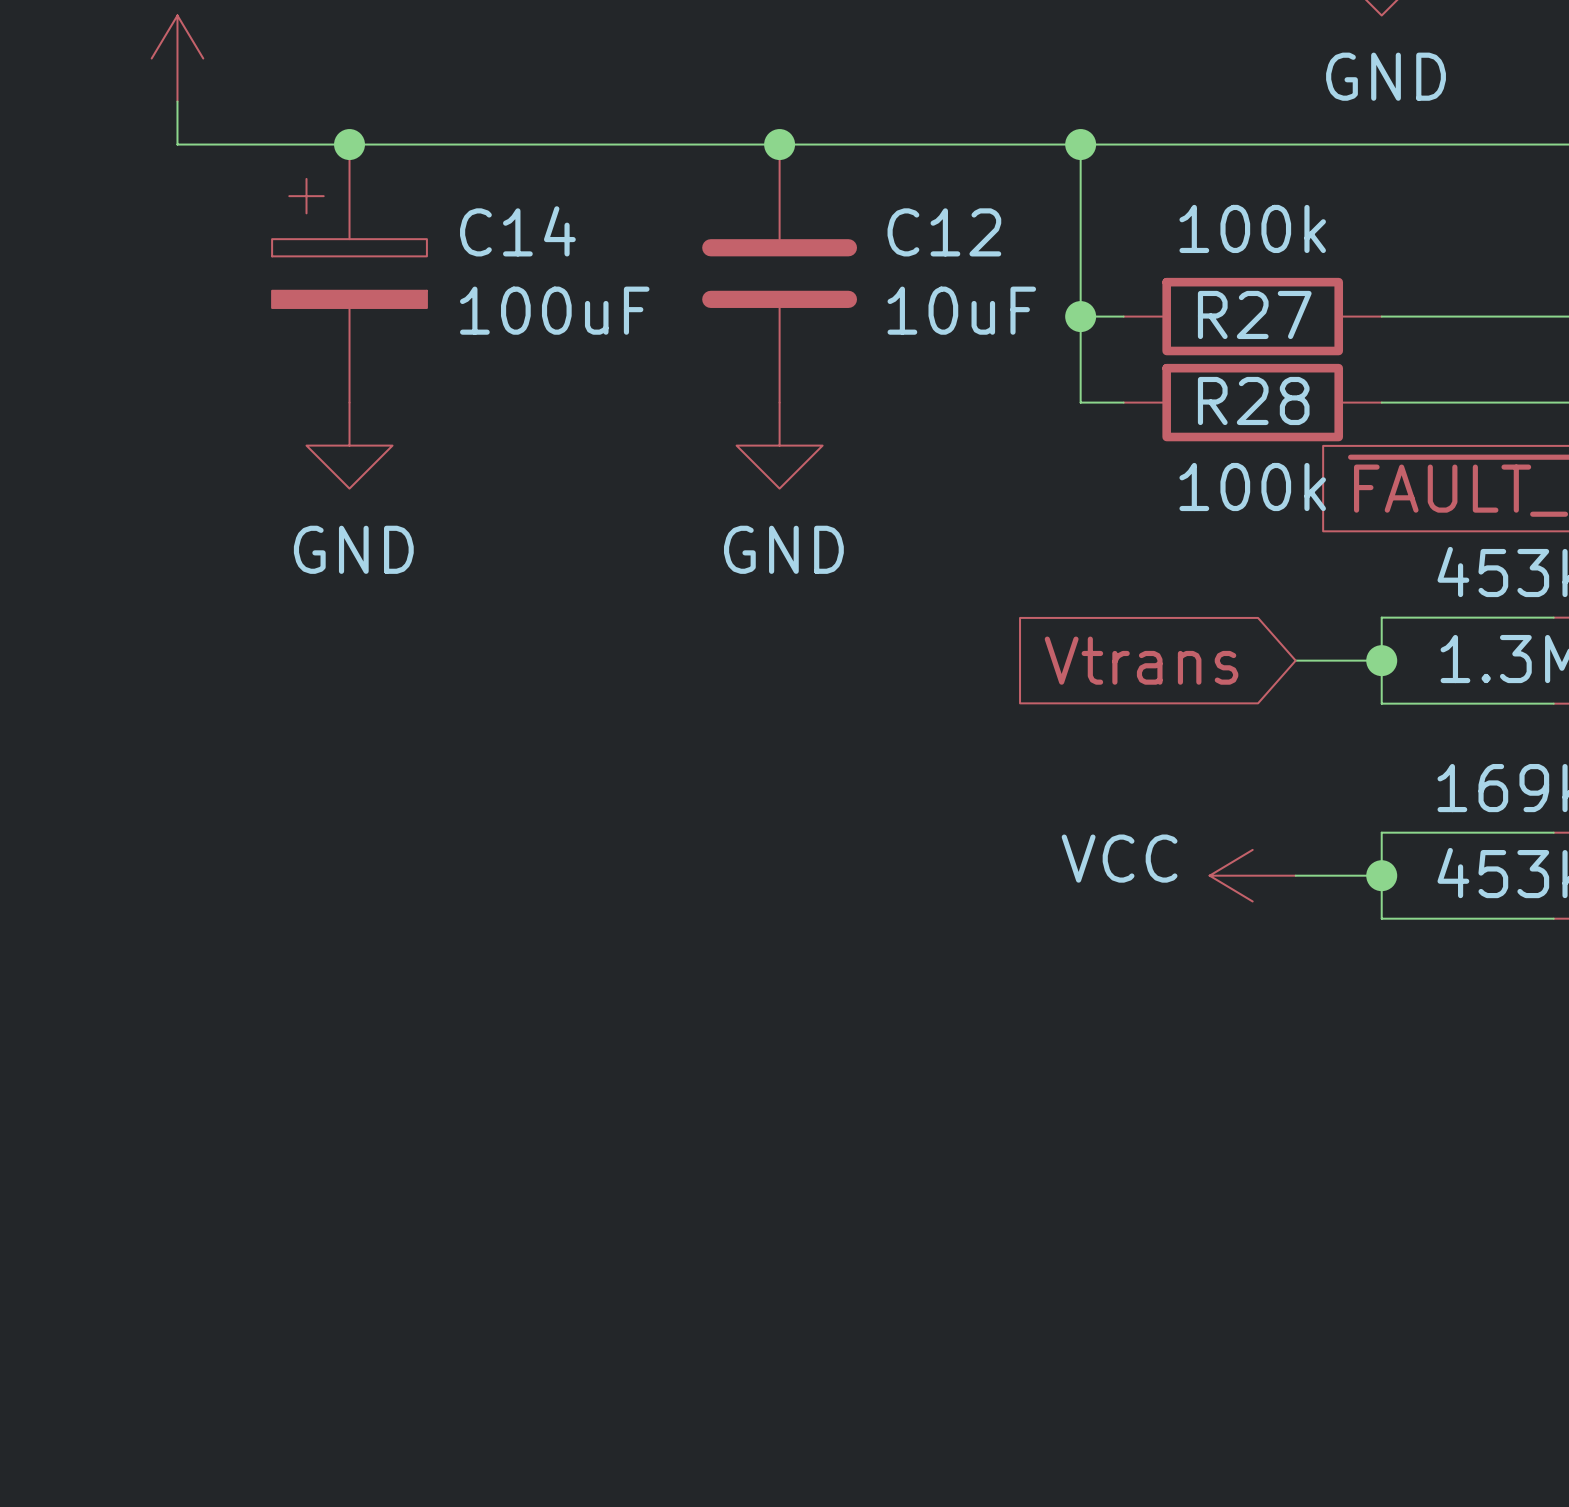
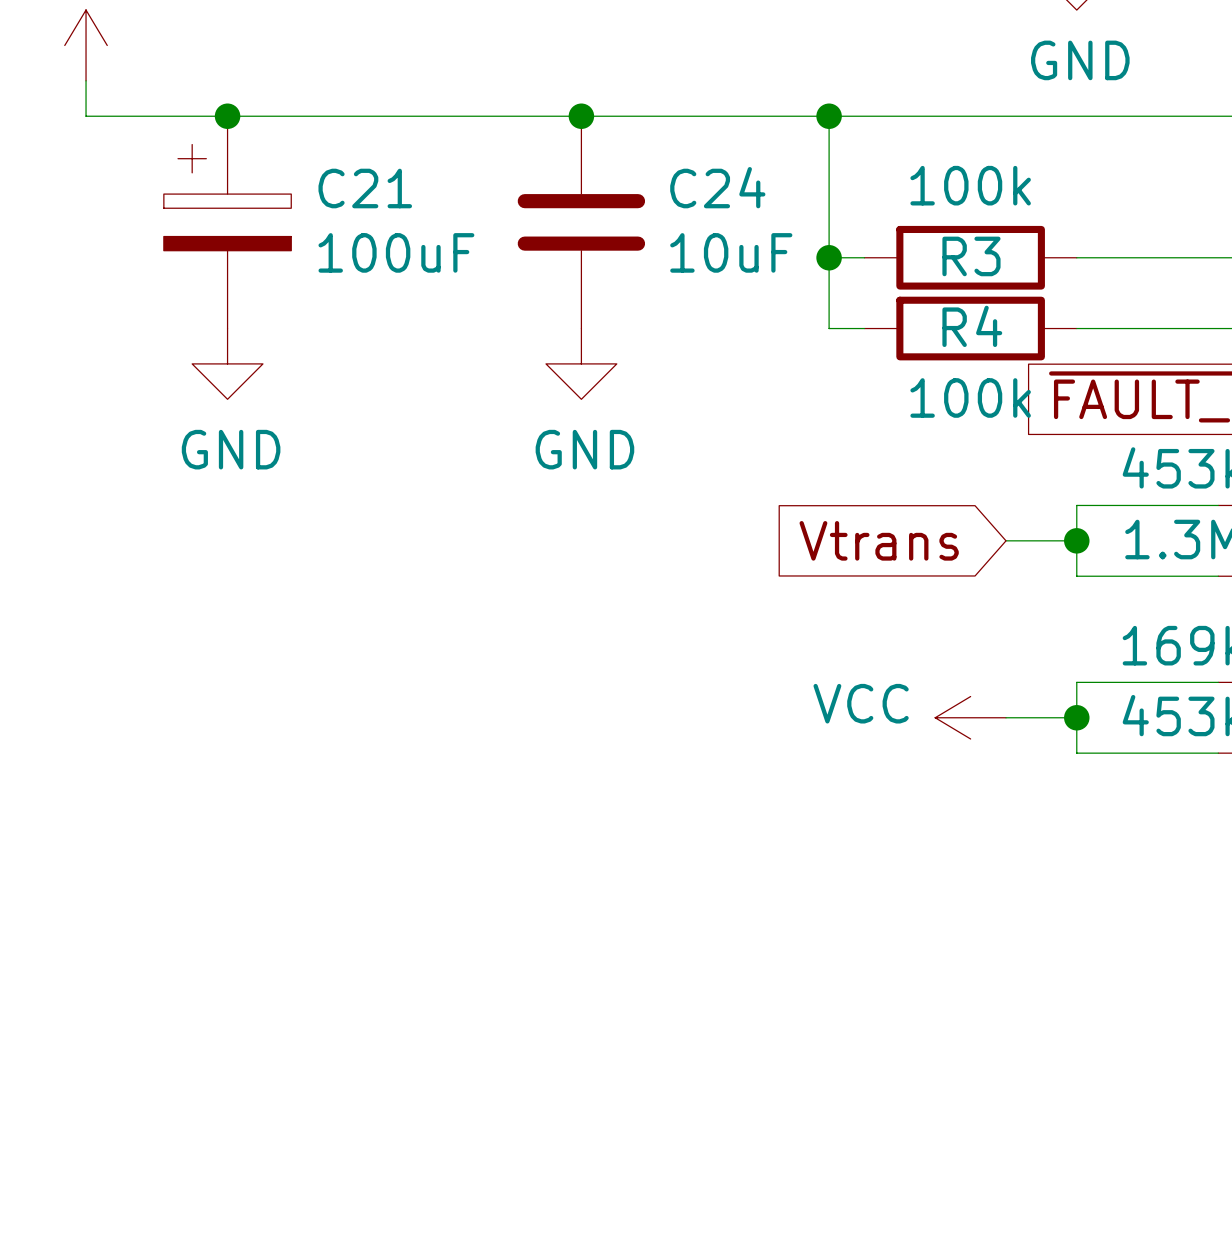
C14 name: C14 (517, 231) -> C21 (365, 188)
C12 name: C12 (944, 232) -> C24 (717, 187)
R27 name: R27 (1254, 314) -> R3 (971, 256)
R28 name: R28 (1253, 400) -> R4 (972, 326)

